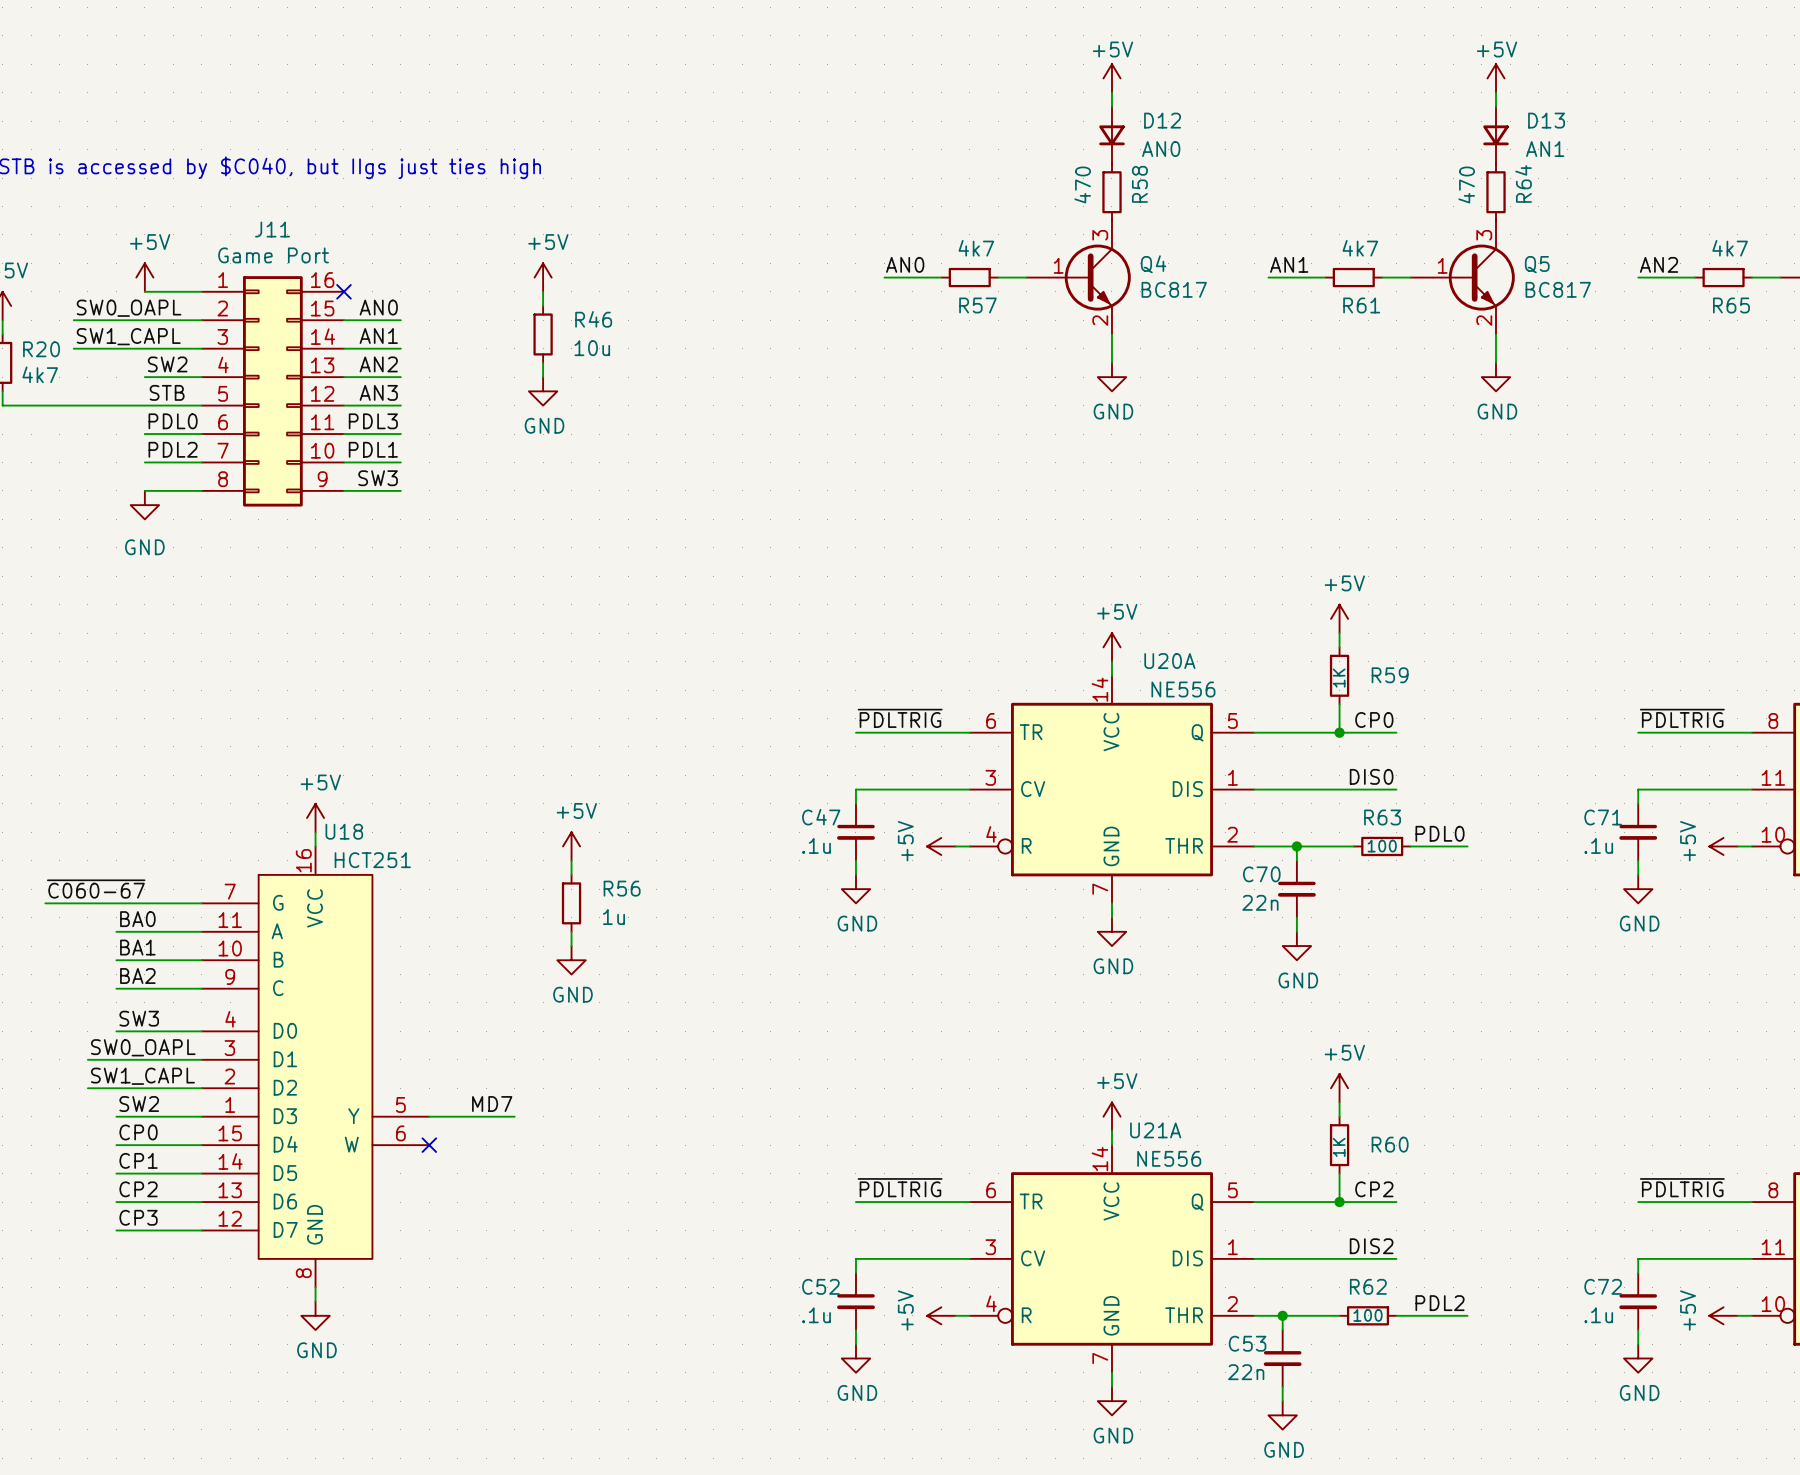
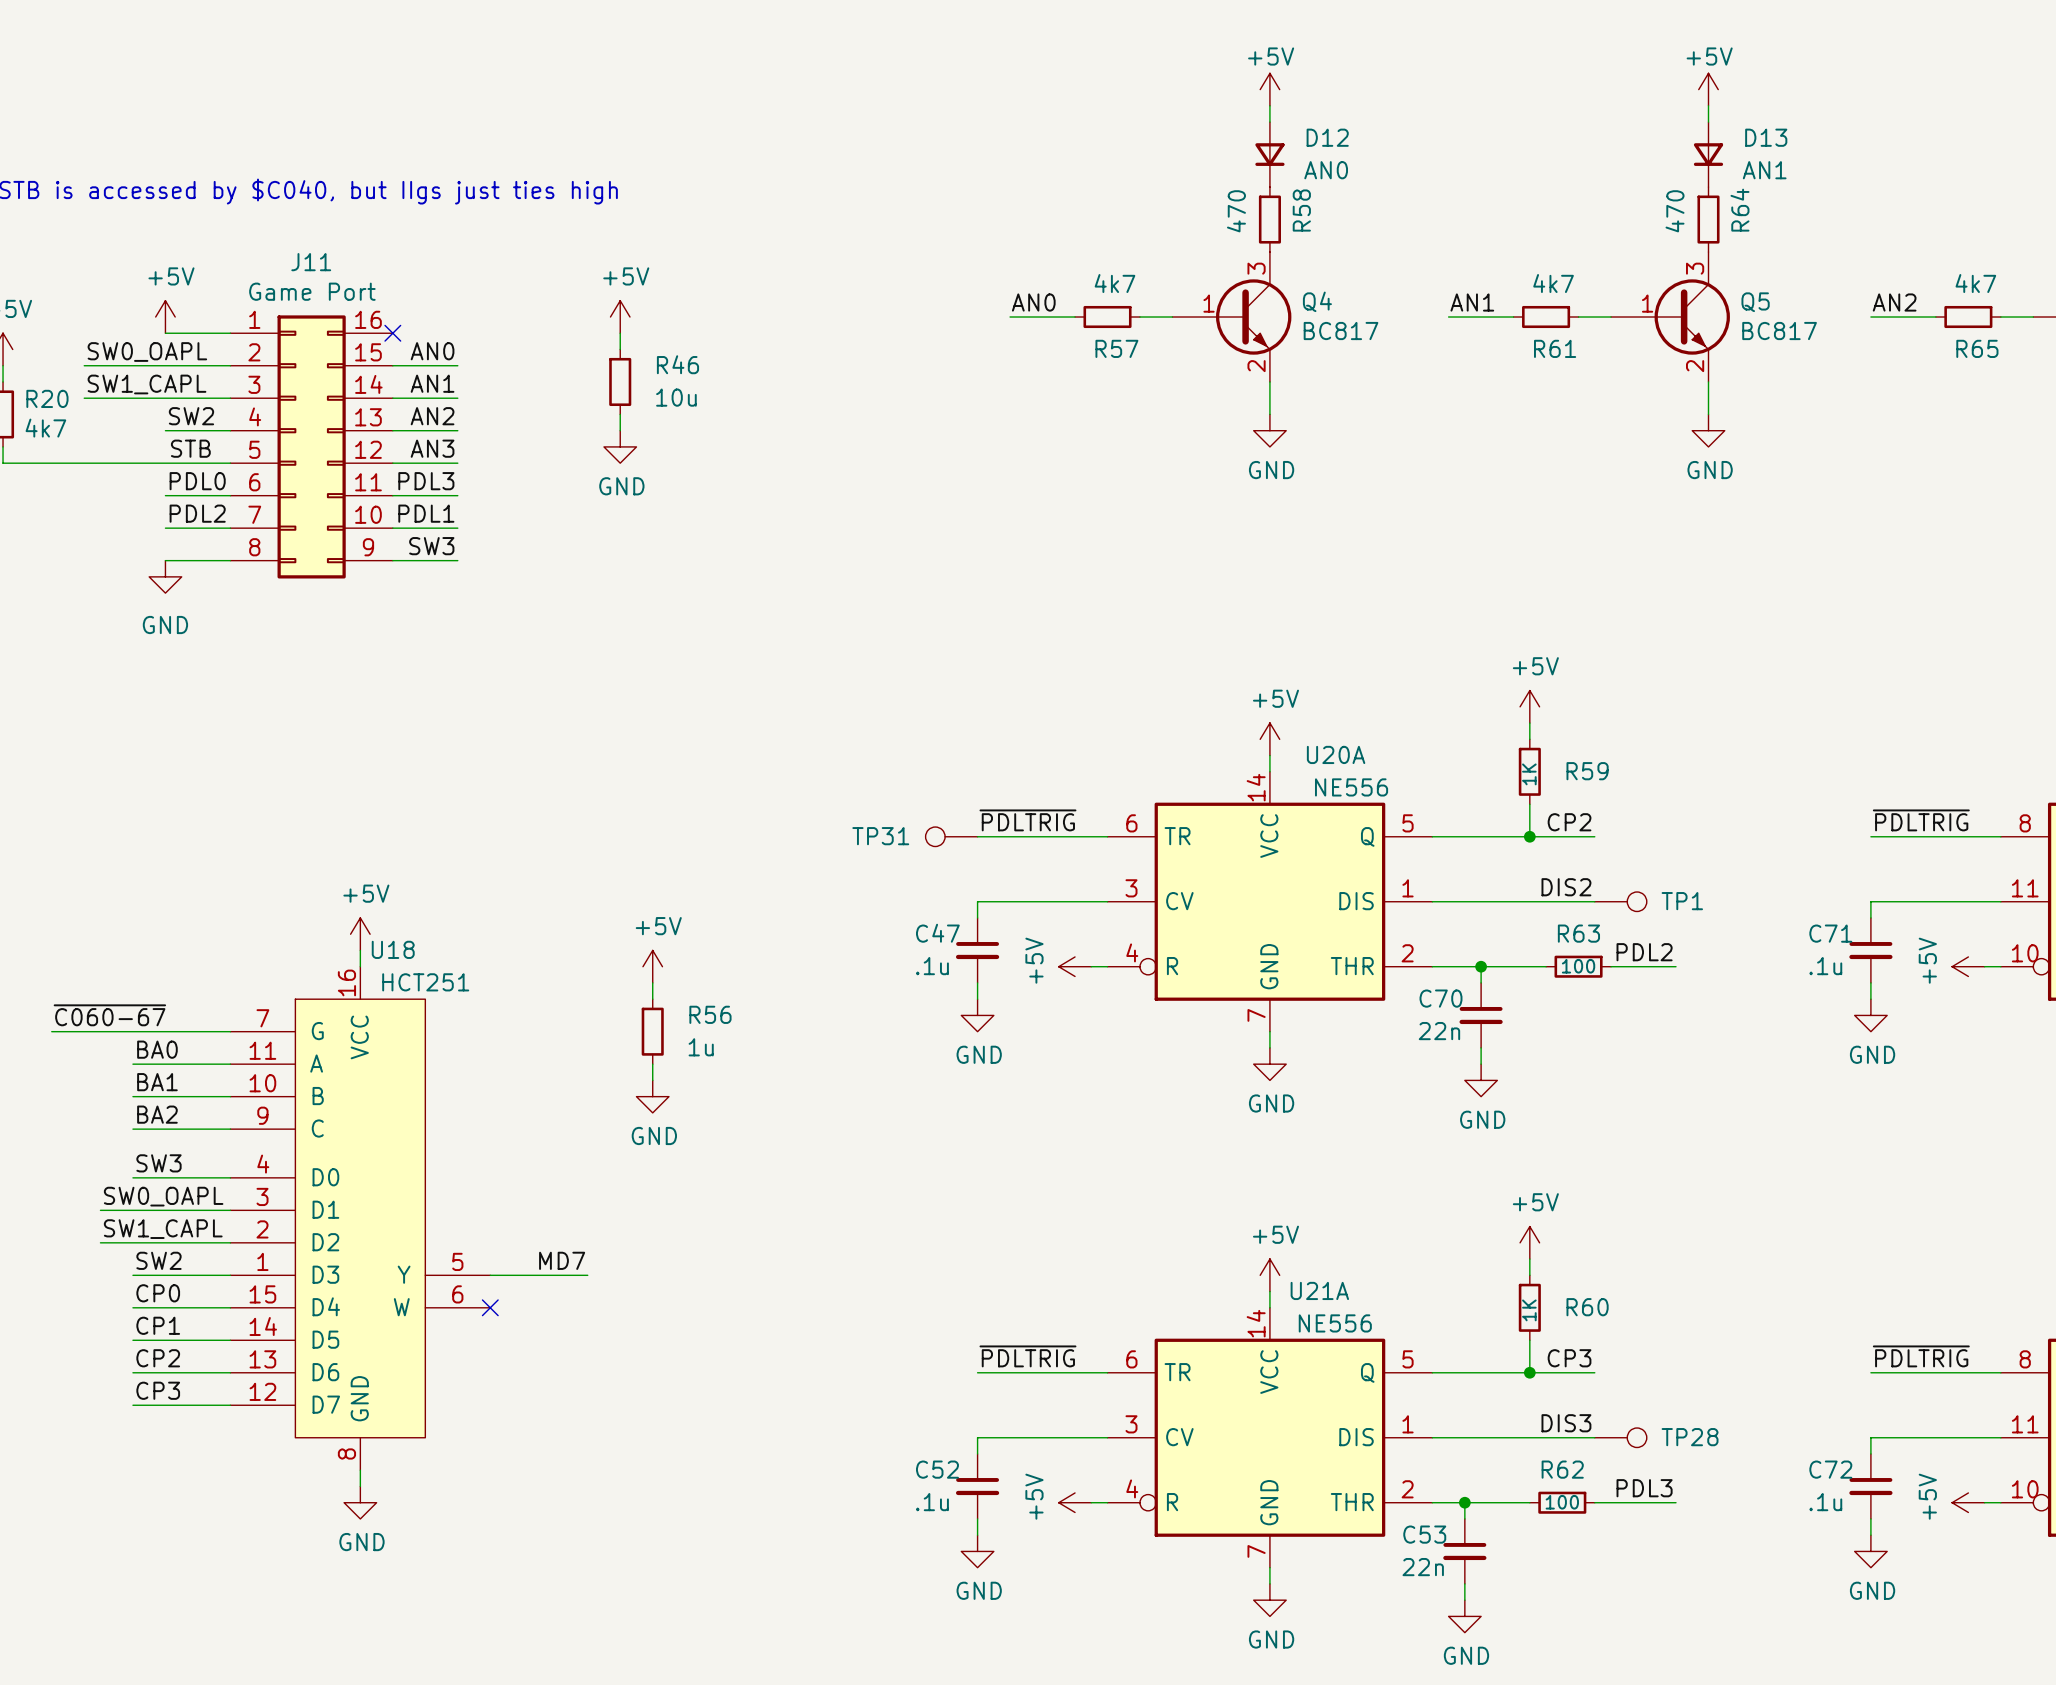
label: CP0 (1374, 720) -> CP2 (1569, 822)
TP31: none -> (951, 836)
label: DIS0 (1371, 776) -> DIS2 (1566, 887)
TP1: none -> (1620, 901)
label: PDL0 (1440, 833) -> PDL2 (1644, 952)
label: CP2 (1374, 1189) -> CP3 (1569, 1358)
label: DIS2 (1371, 1246) -> DIS3 (1566, 1423)
TP28: none -> (1620, 1437)
label: PDL2 (1440, 1303) -> PDL3 (1644, 1488)

